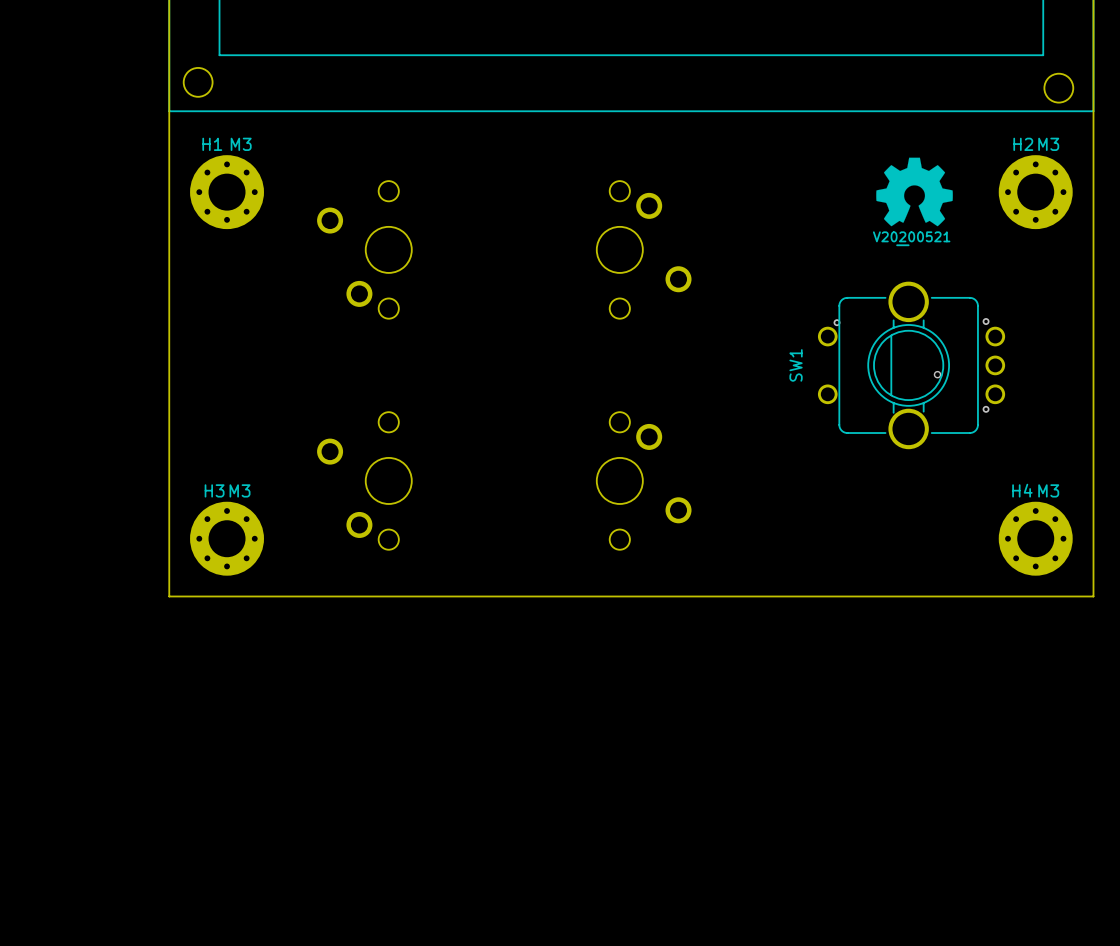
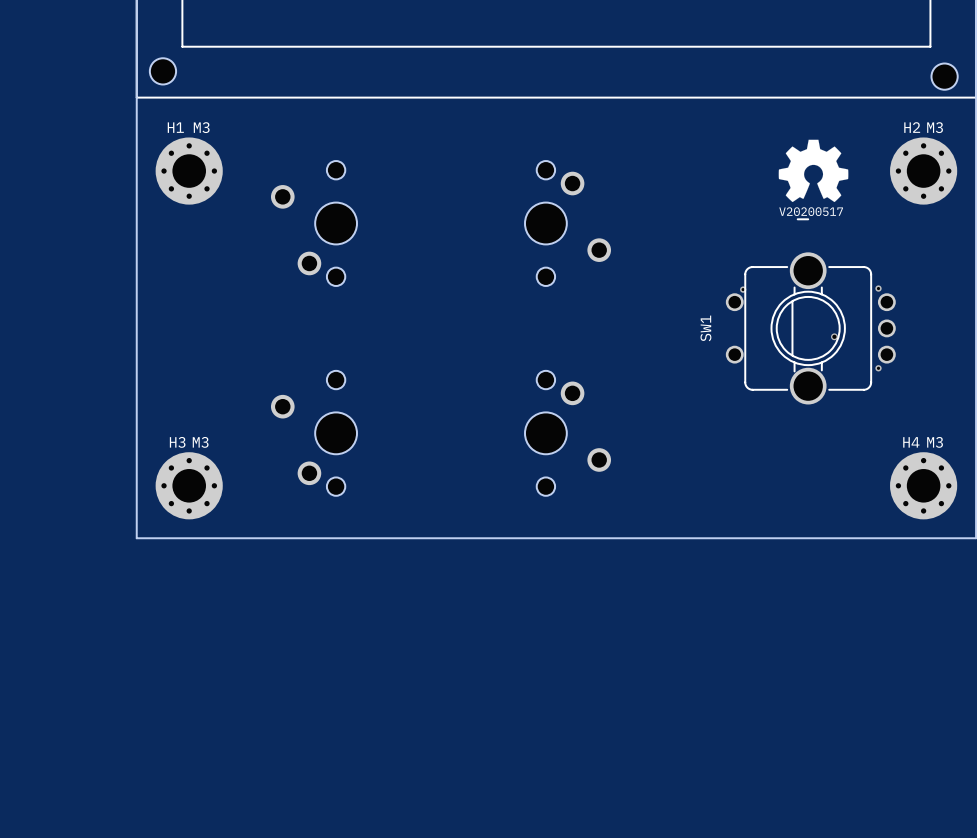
drawing shape: [872, 231, 951, 247] -> [779, 207, 843, 221]

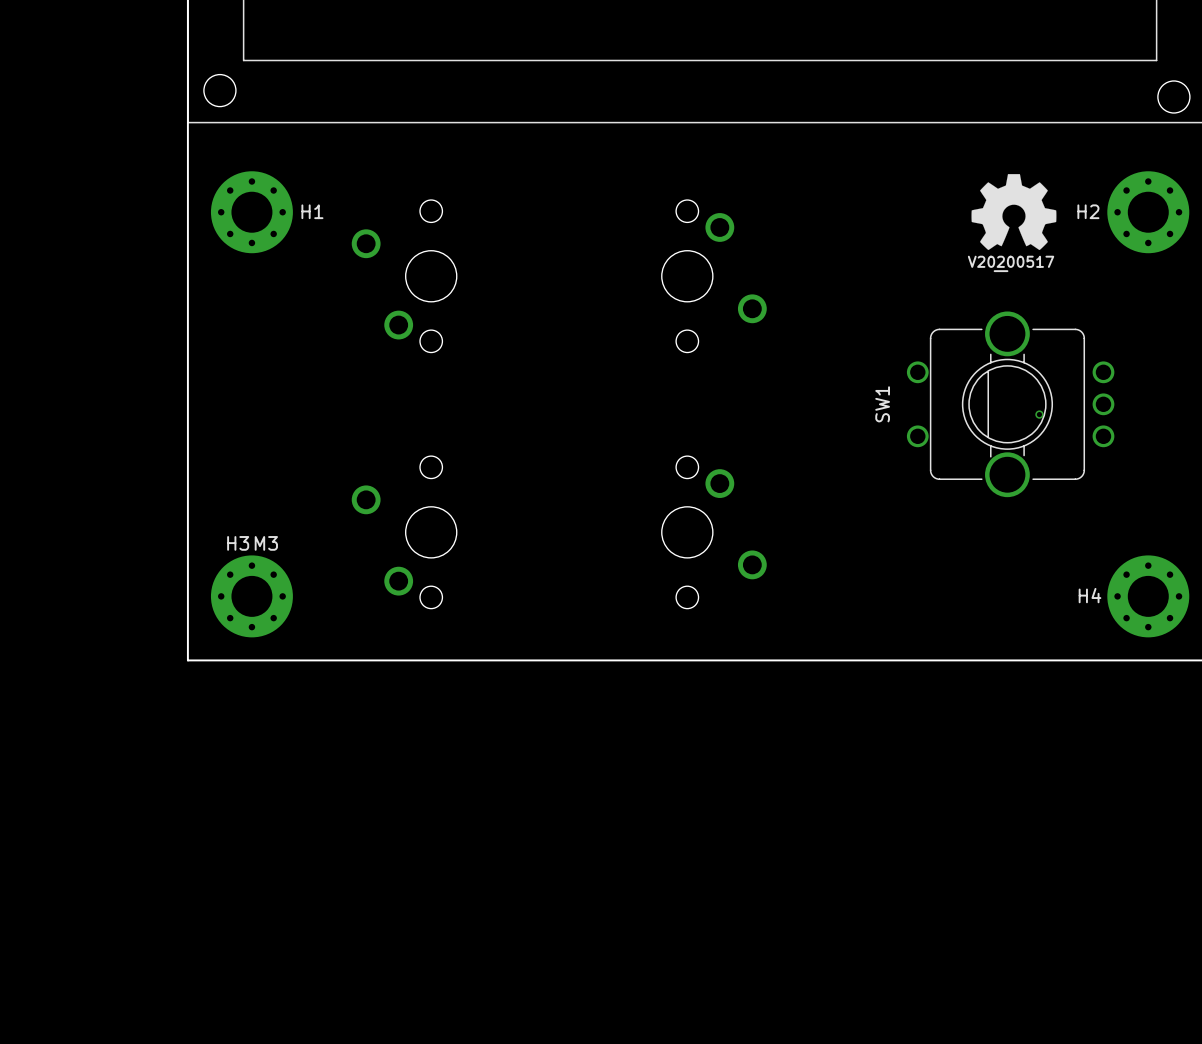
H1 name position: H1 (175, 127) -> H1 (312, 211)
H1 value: M3 (201, 127) -> none
H2 name position: H2 (912, 127) -> H2 (1088, 211)
H2 value: M3 (935, 127) -> none
via: (878, 288) -> none
via: (743, 289) -> none
via: (878, 368) -> none
H4 name position: H4 (911, 442) -> H4 (1090, 595)
H4 value: M3 (935, 442) -> none

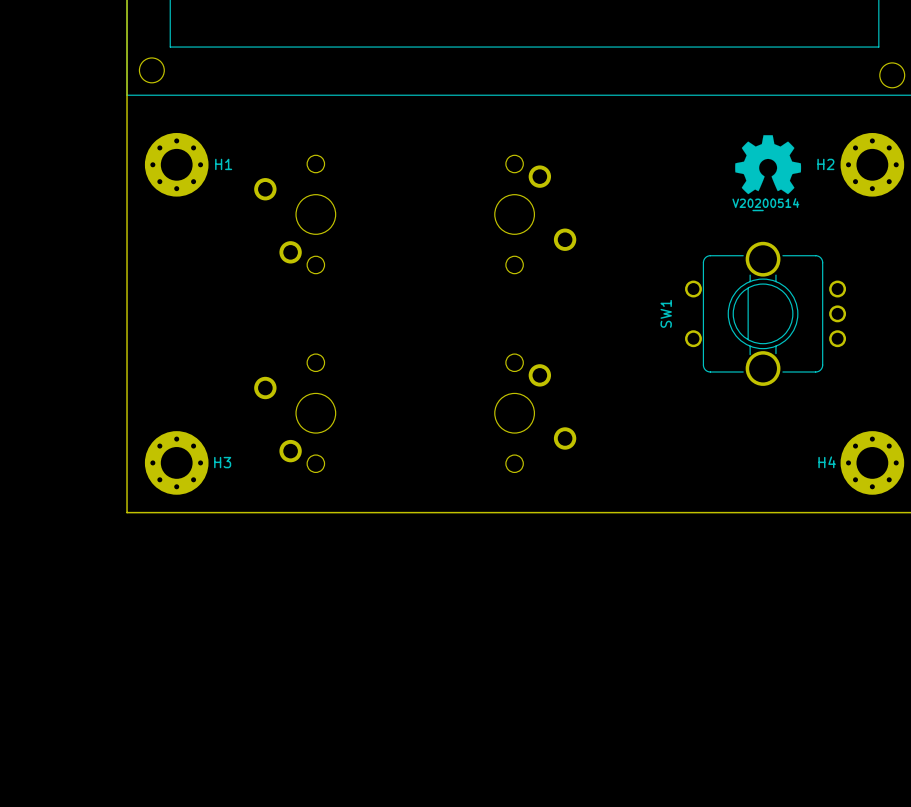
drawing shape: [967, 255, 1055, 273] -> [732, 198, 800, 212]
via: (1039, 414) -> none
H3 name position: H3 (238, 543) -> H3 (222, 462)
H3 value: M3 (266, 543) -> none

